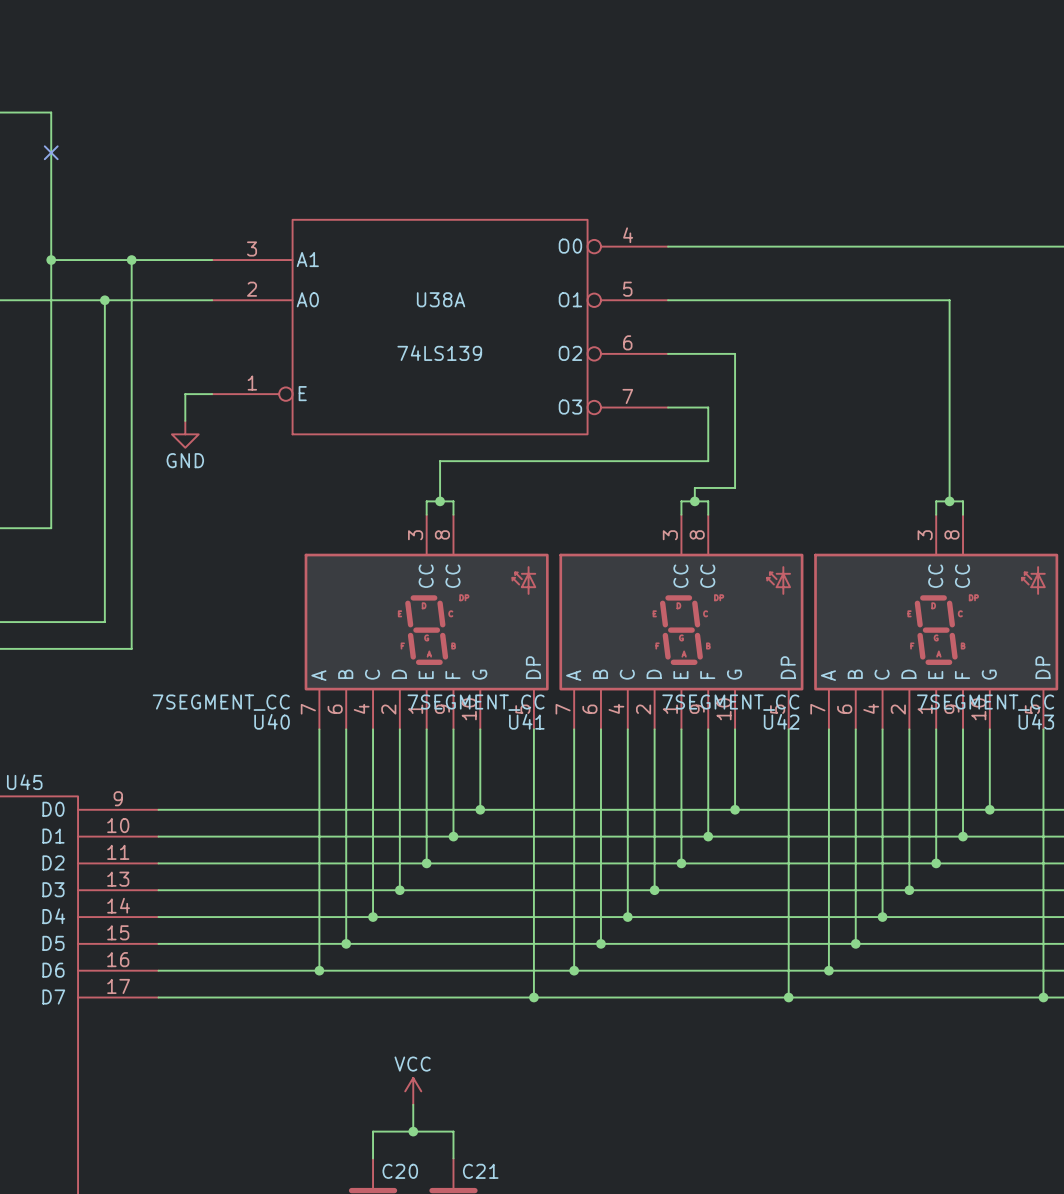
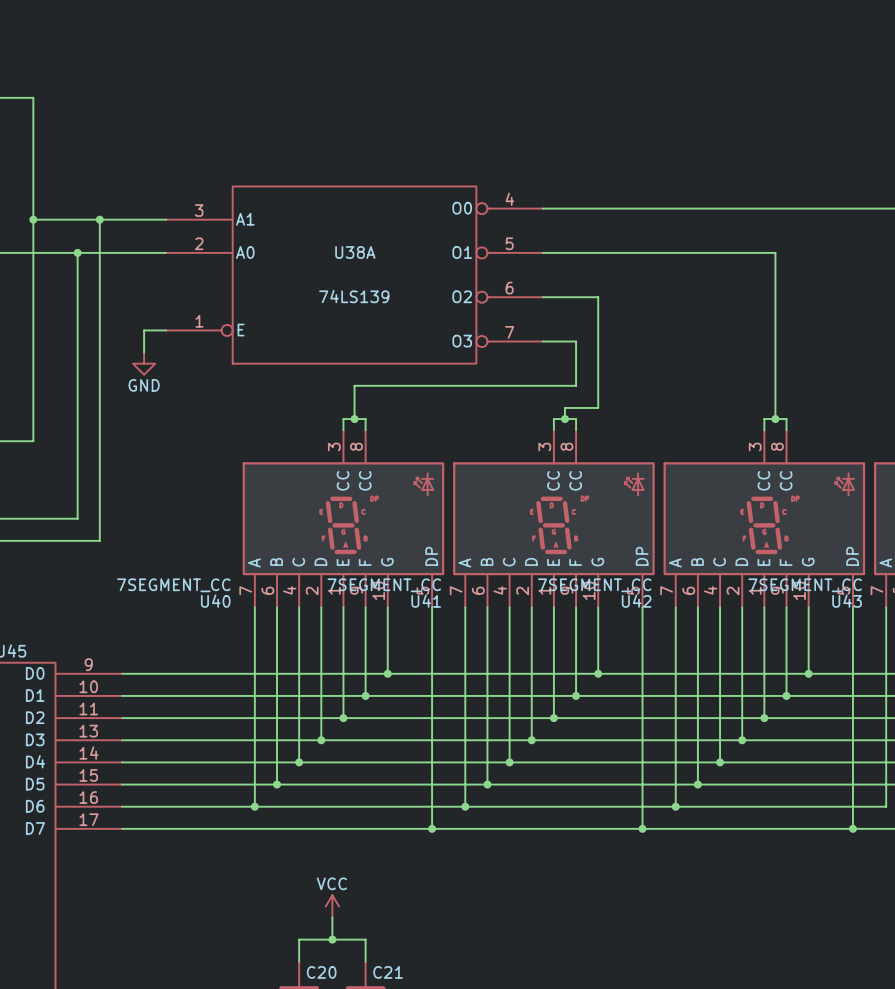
no-connect mark: (51, 152) -> none

